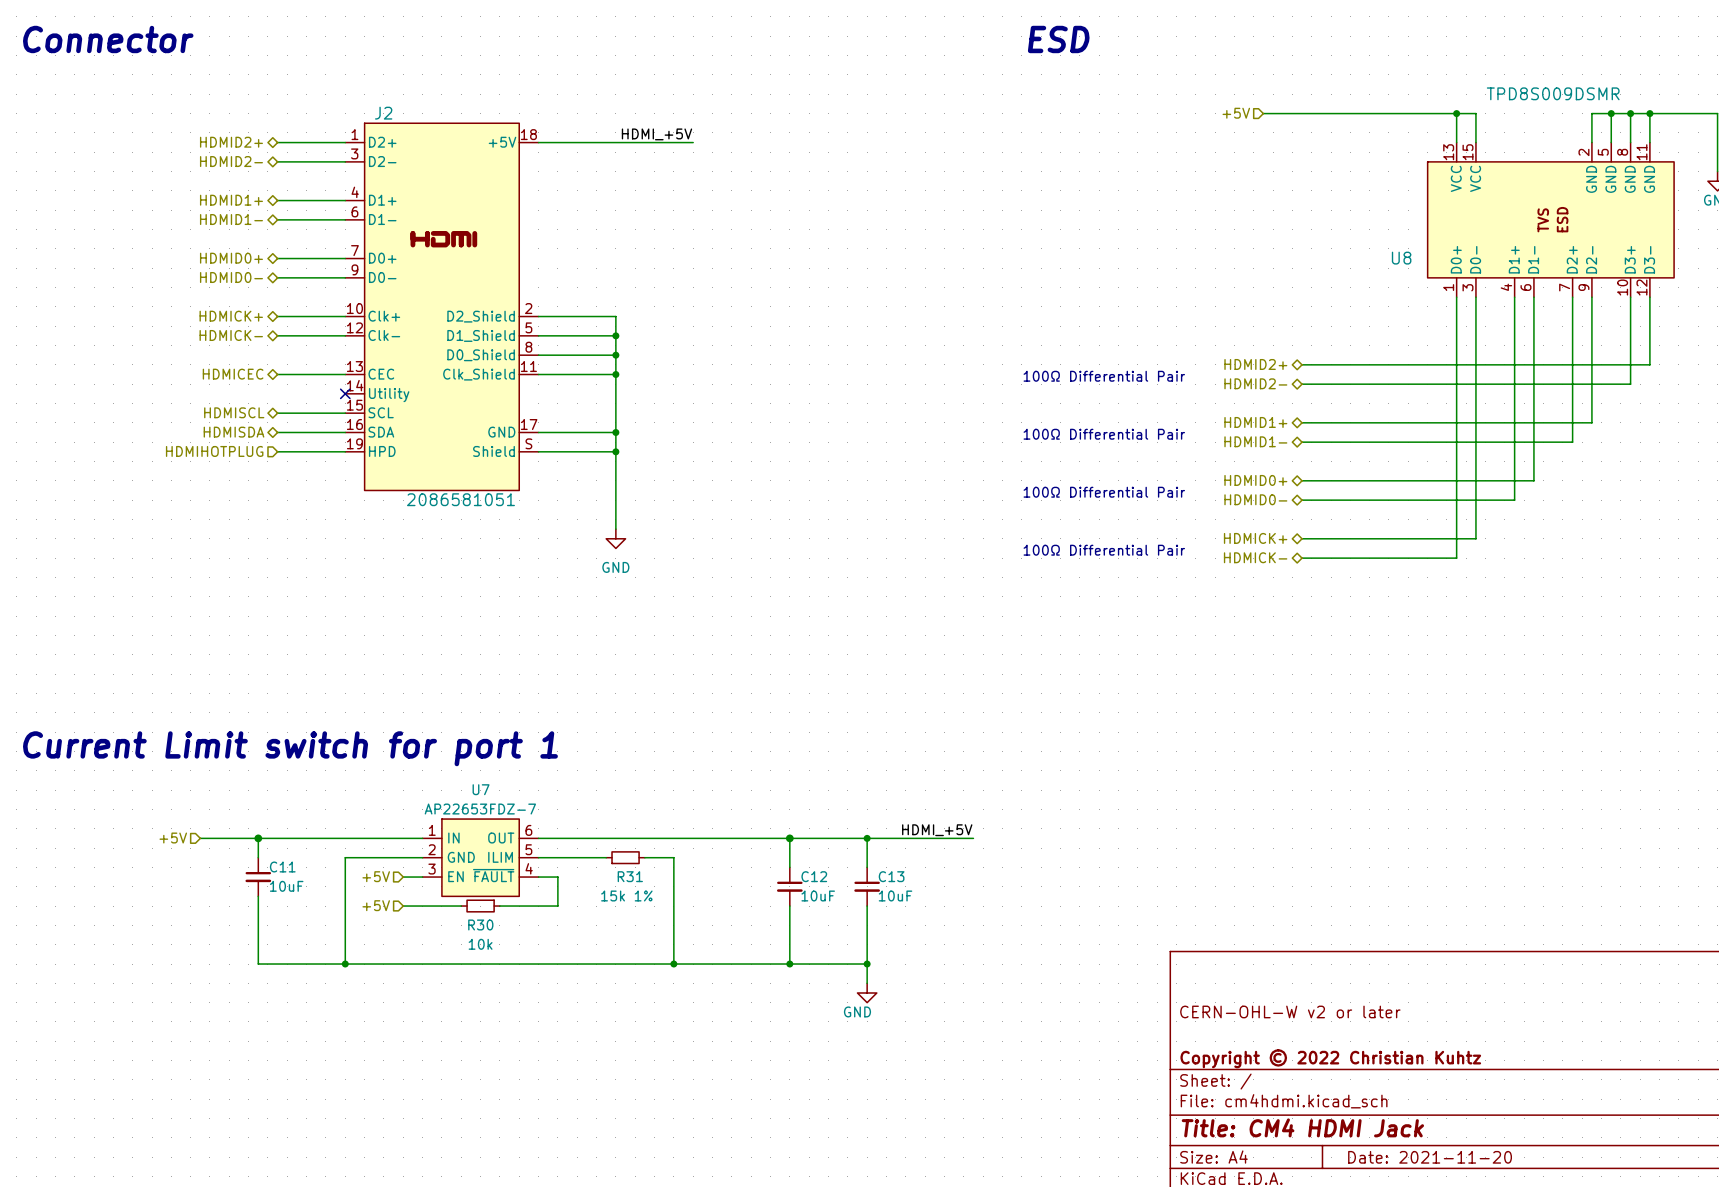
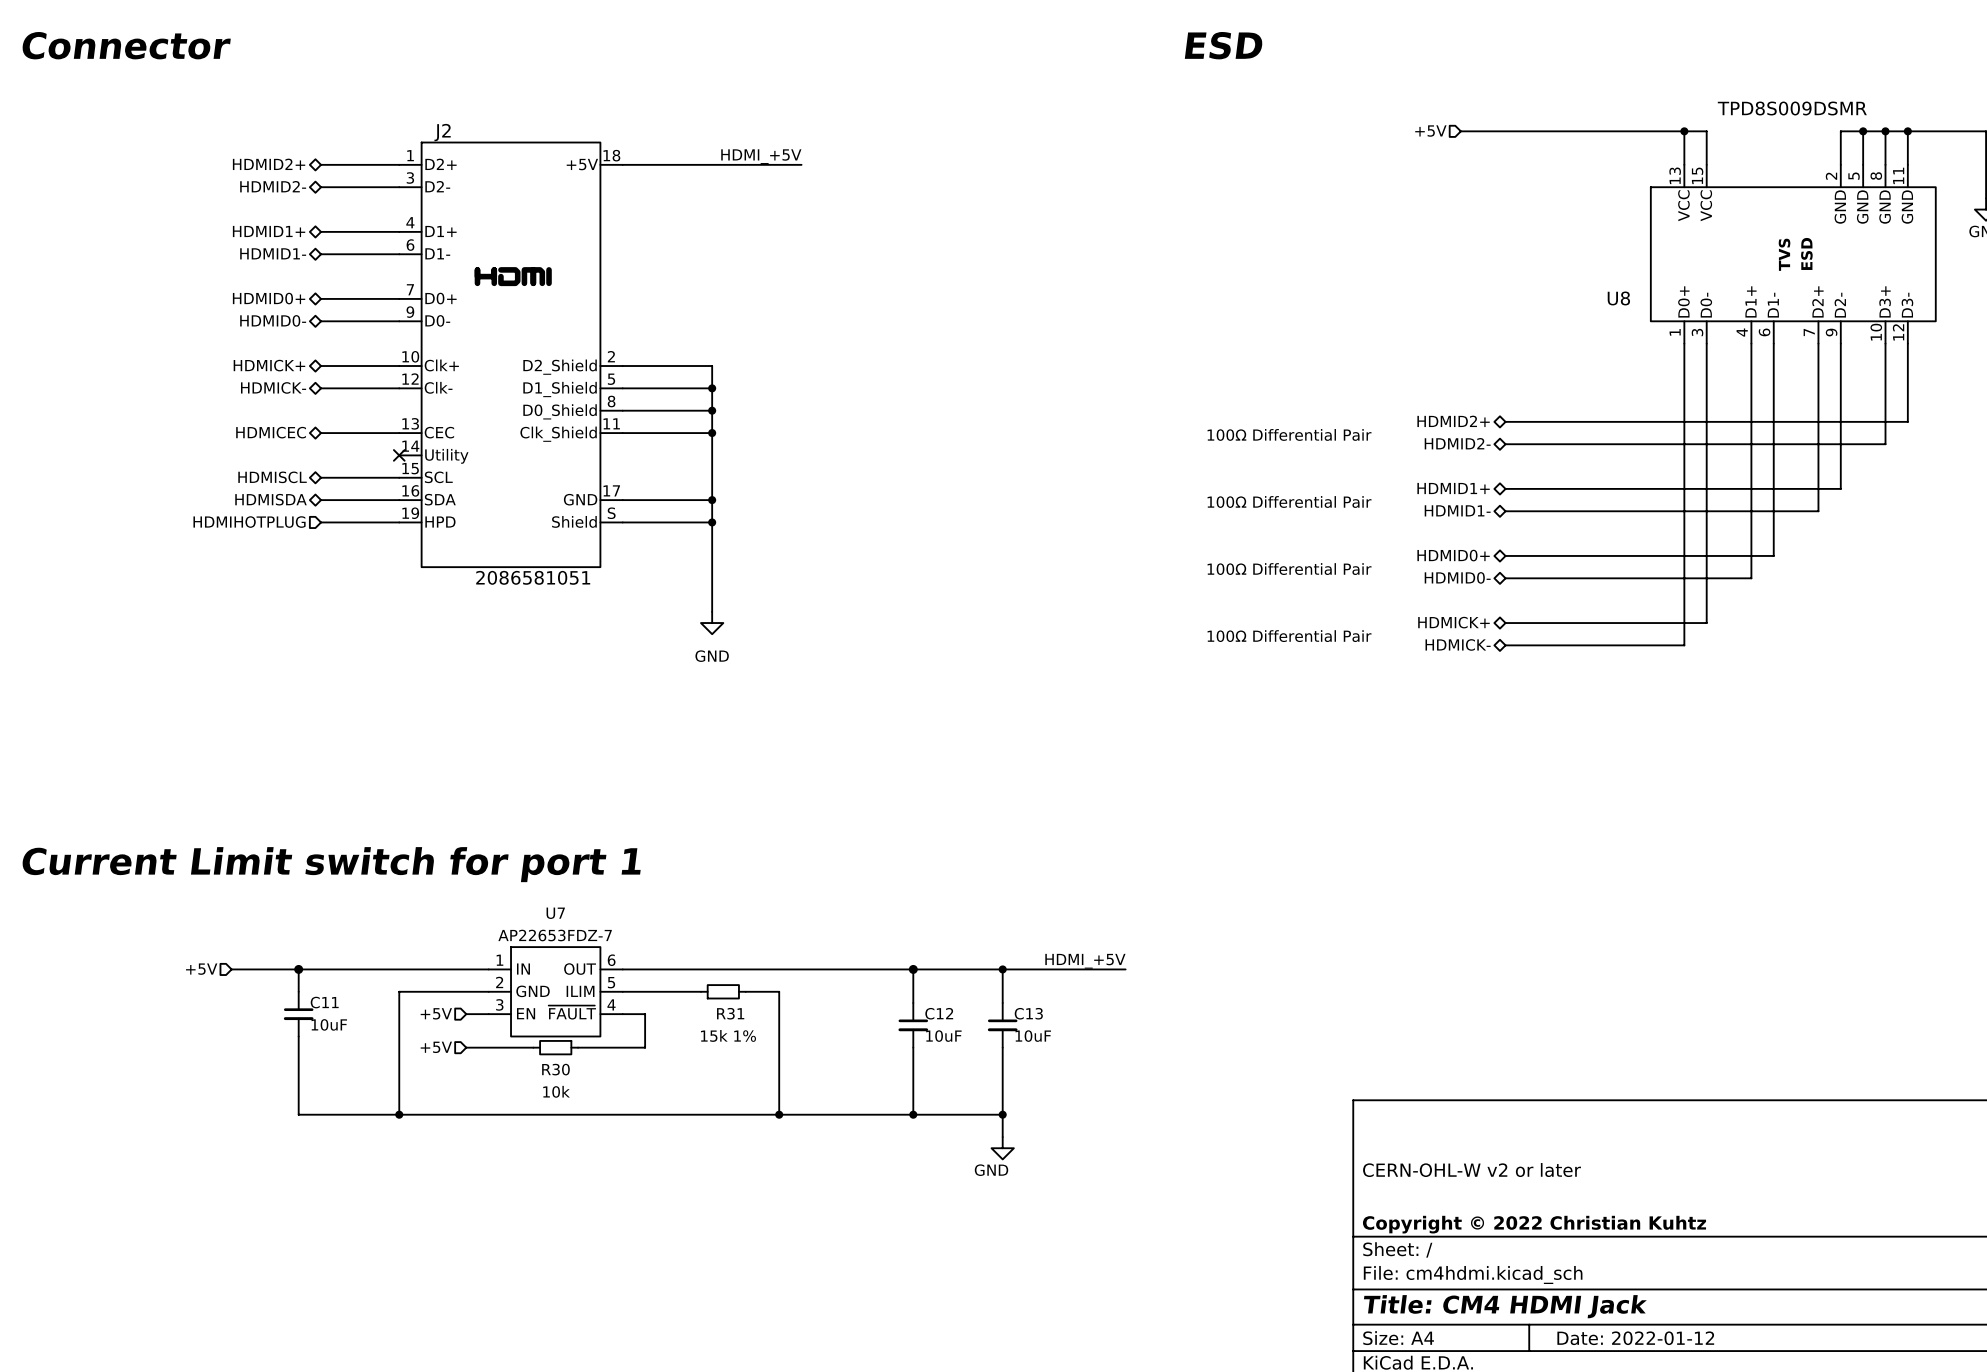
title block: Date: 2021-11-20 (1430, 1157) -> Date: 2022-01-12 (1635, 1338)

